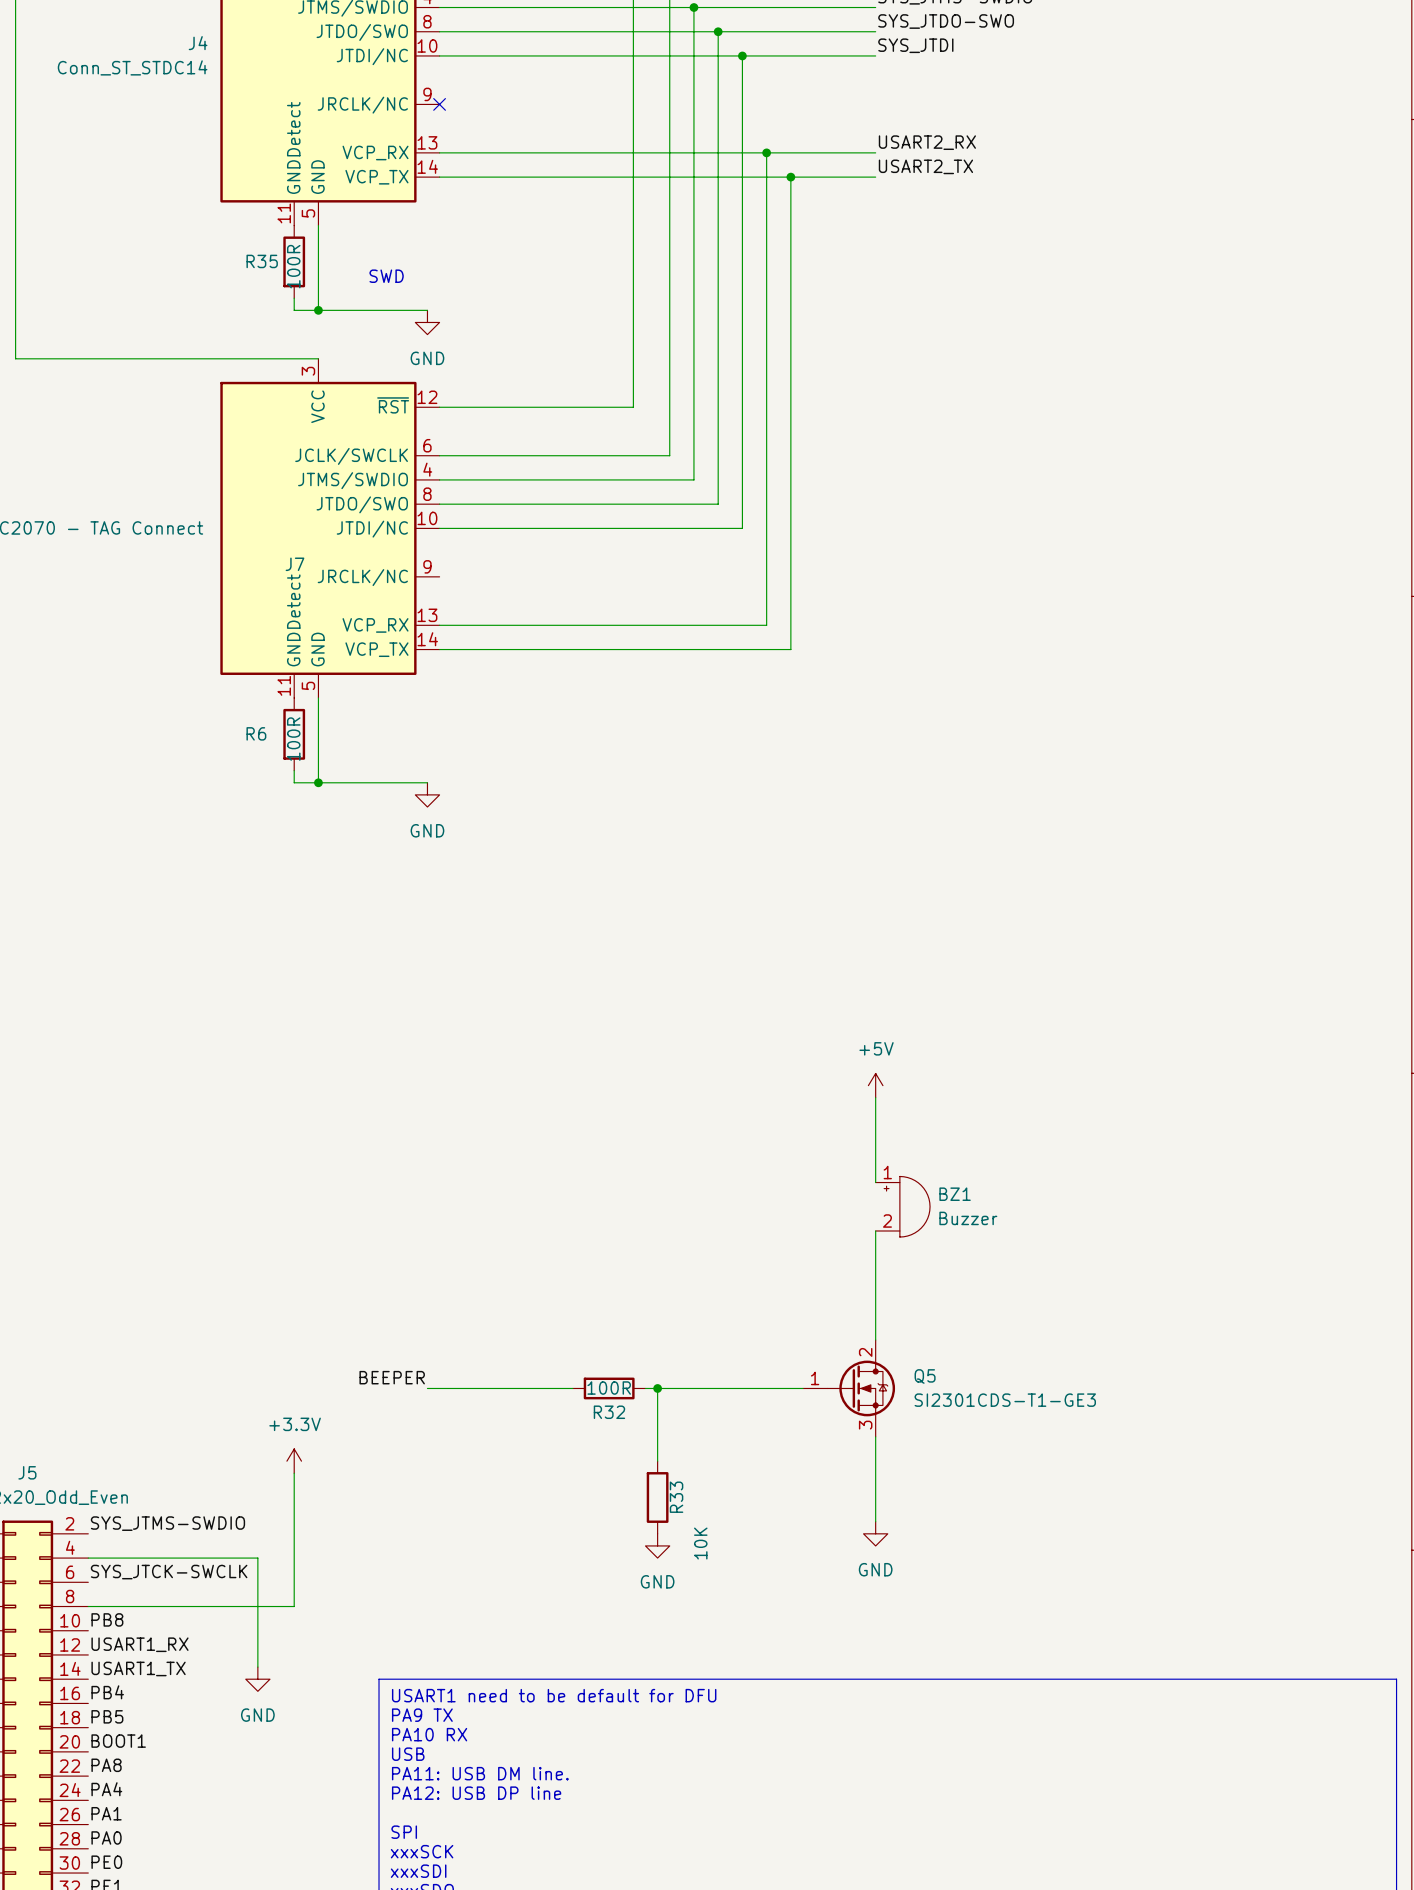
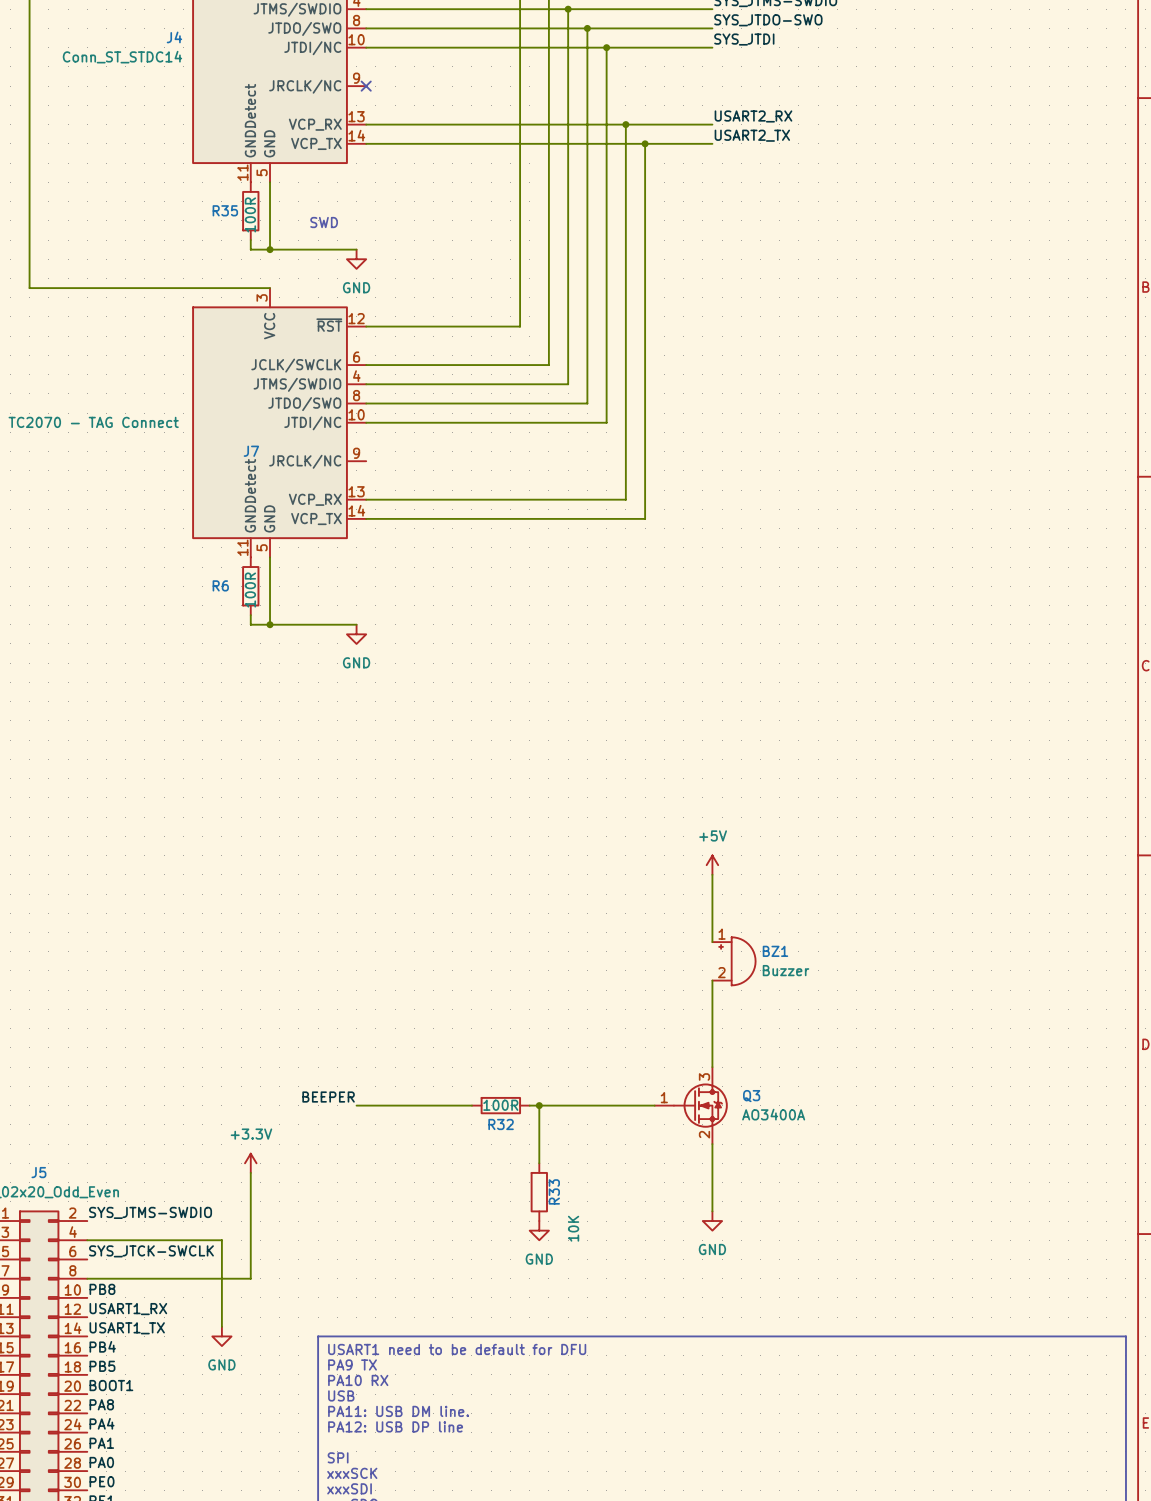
Q5 pin number: 2 (865, 1352) -> 3 (704, 1076)
Q5 name: Q5 (925, 1376) -> Q3 (751, 1096)
Q5 value: SI2301CDS-T1-GE3 (1005, 1400) -> AO3400A (773, 1114)
Q5 pin number: 3 (865, 1425) -> 2 (704, 1134)

